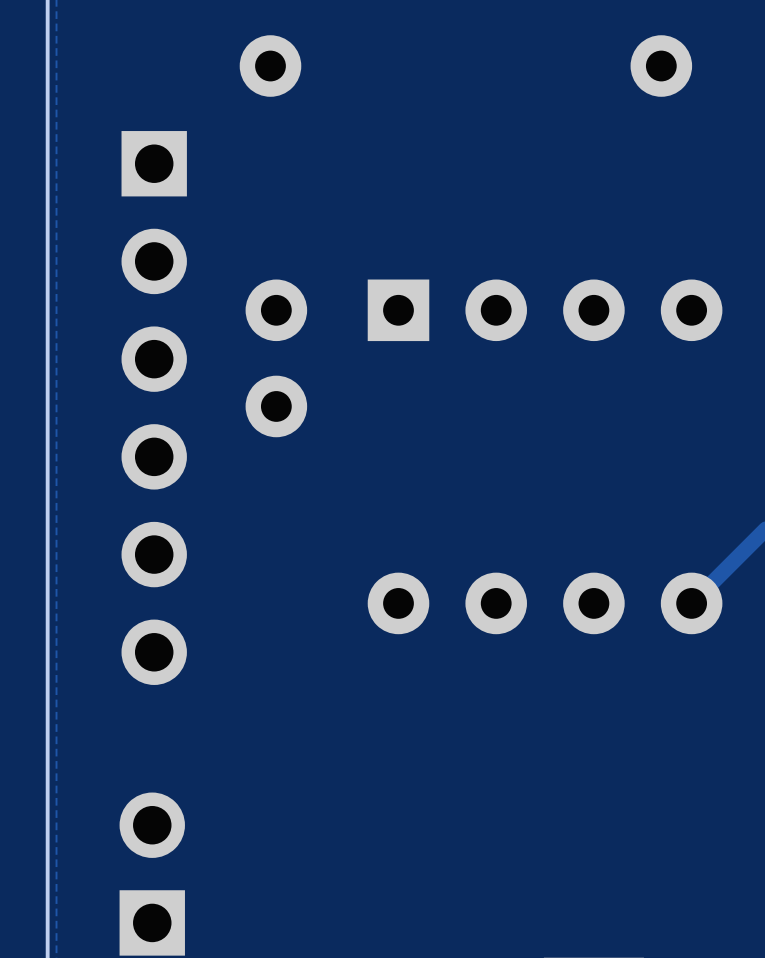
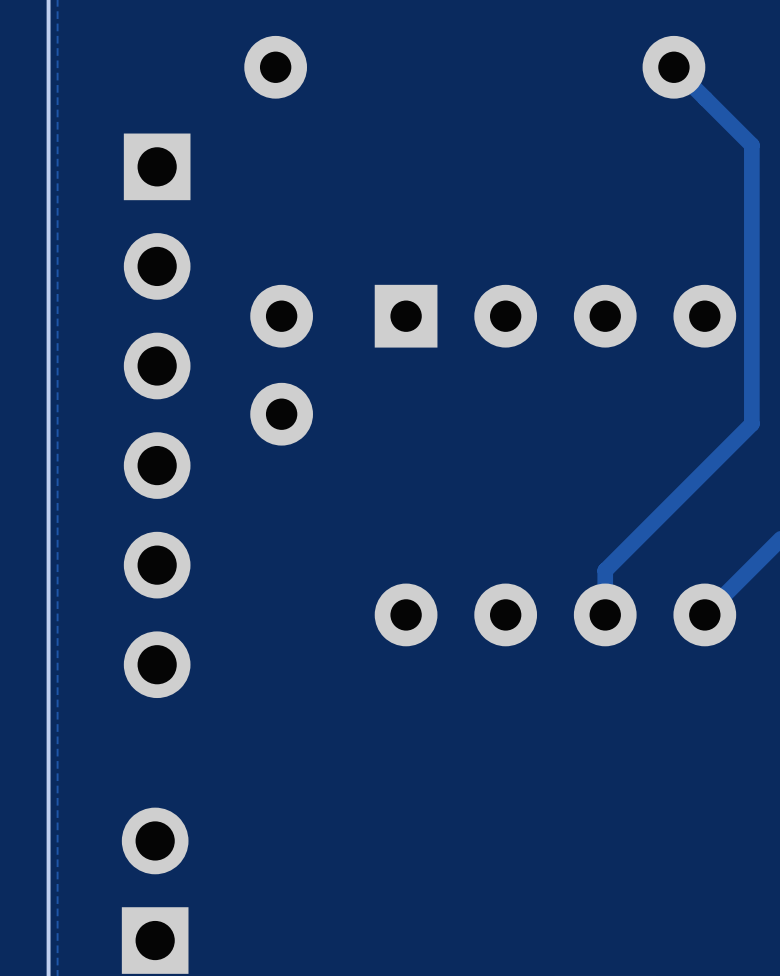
track: none -> (673, 67) (751, 145) (751, 423) (605, 570) (605, 614)

